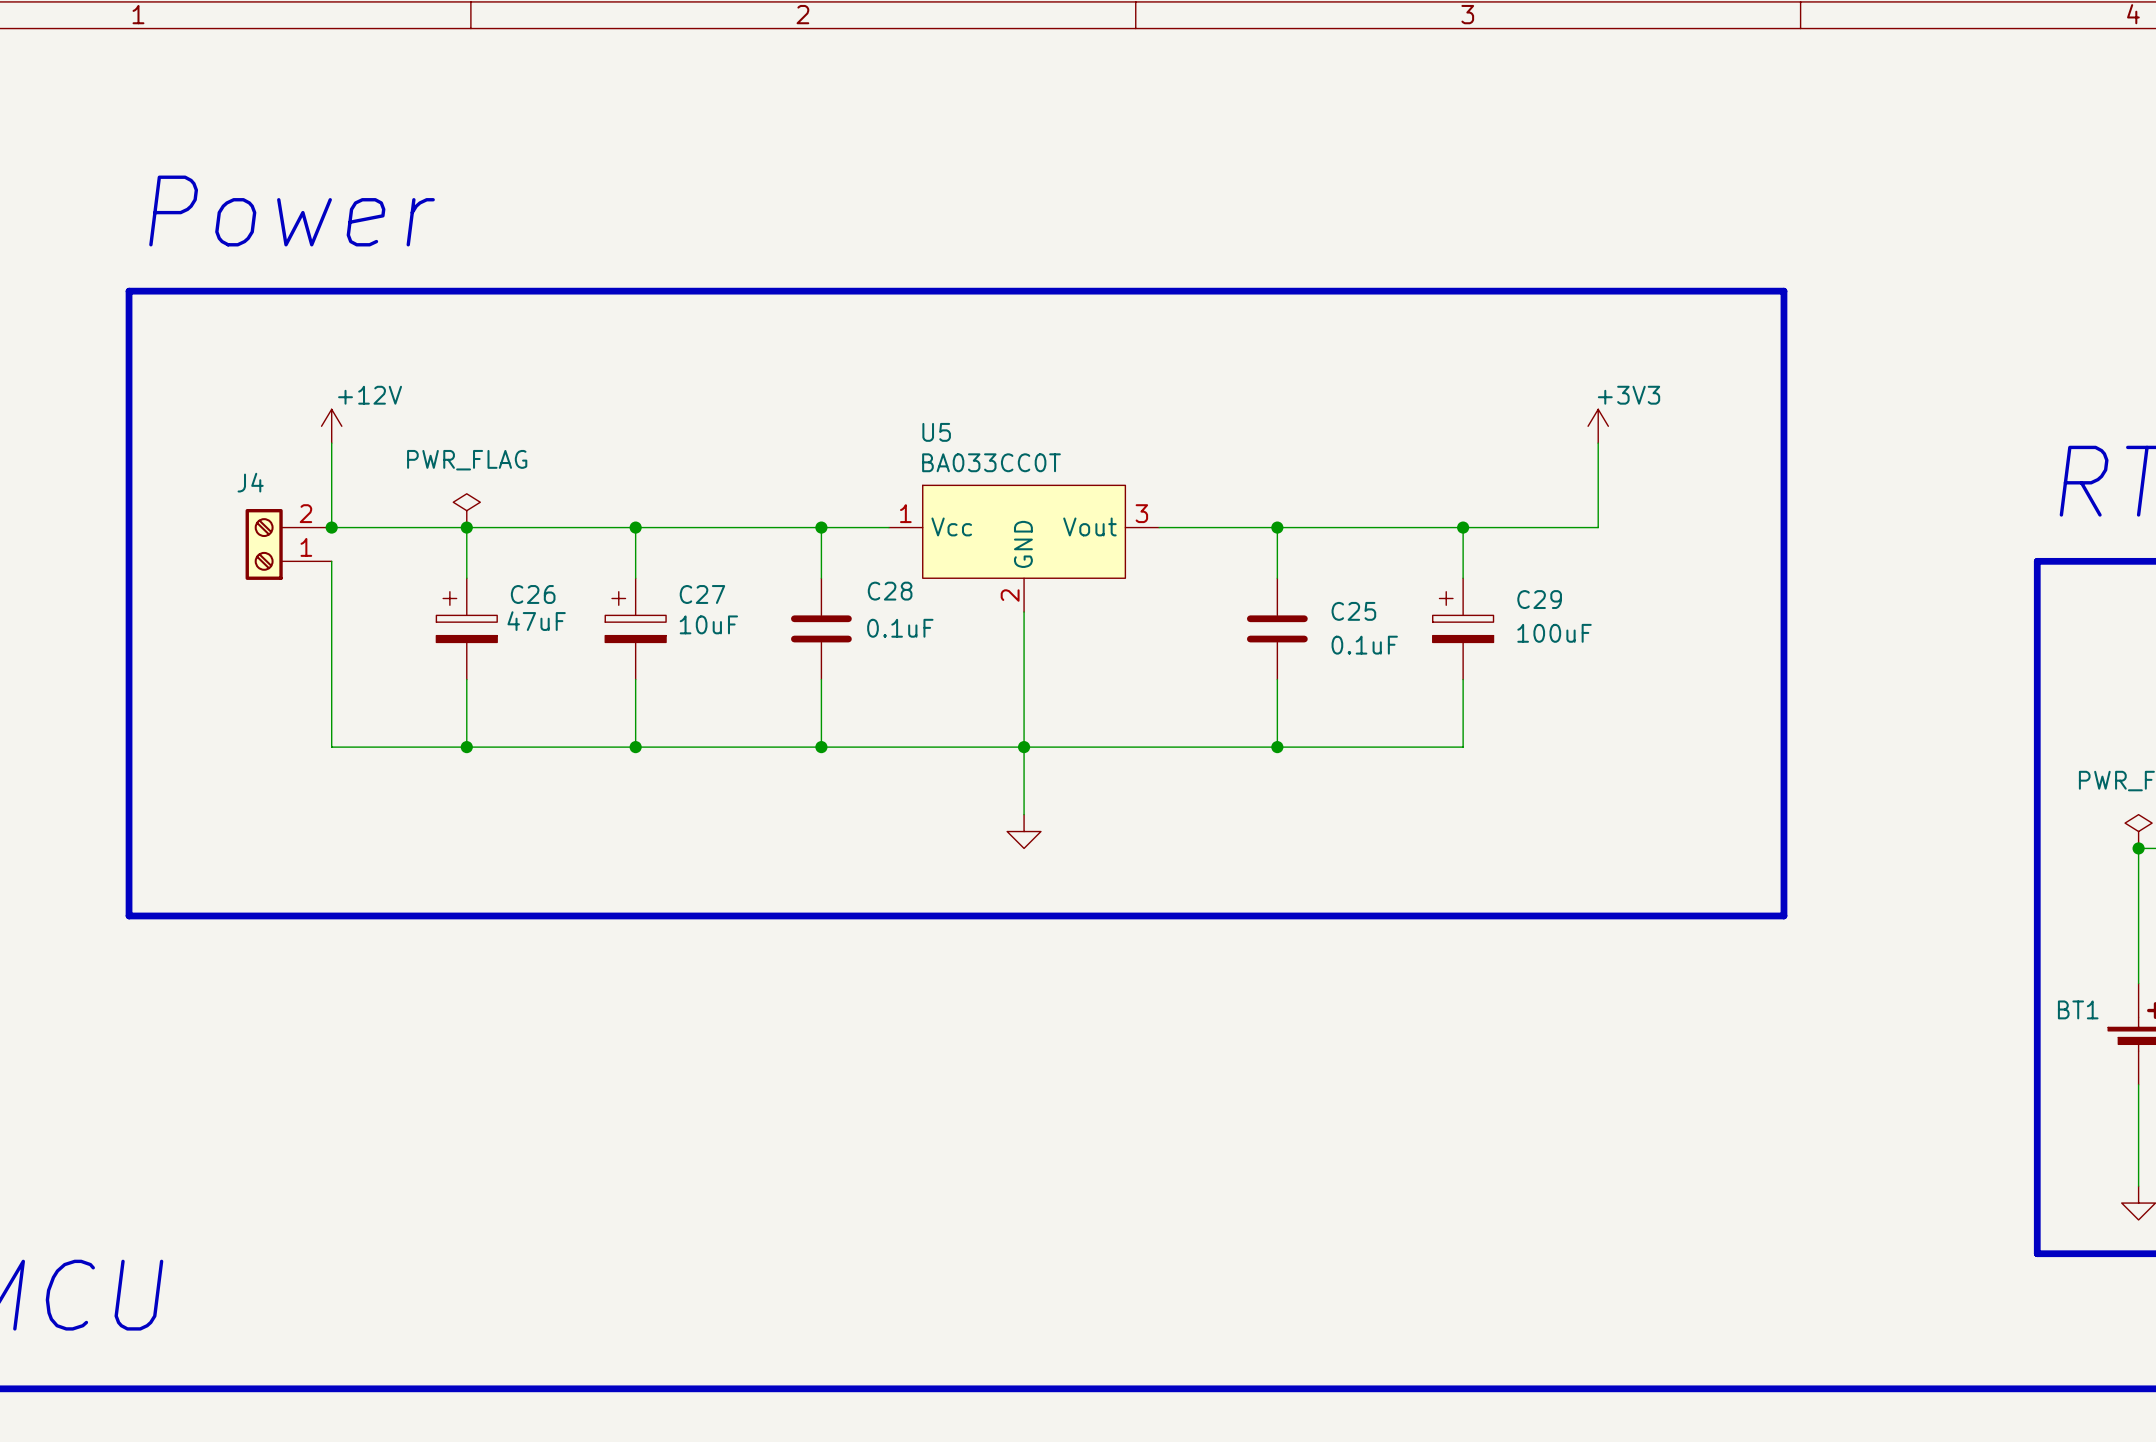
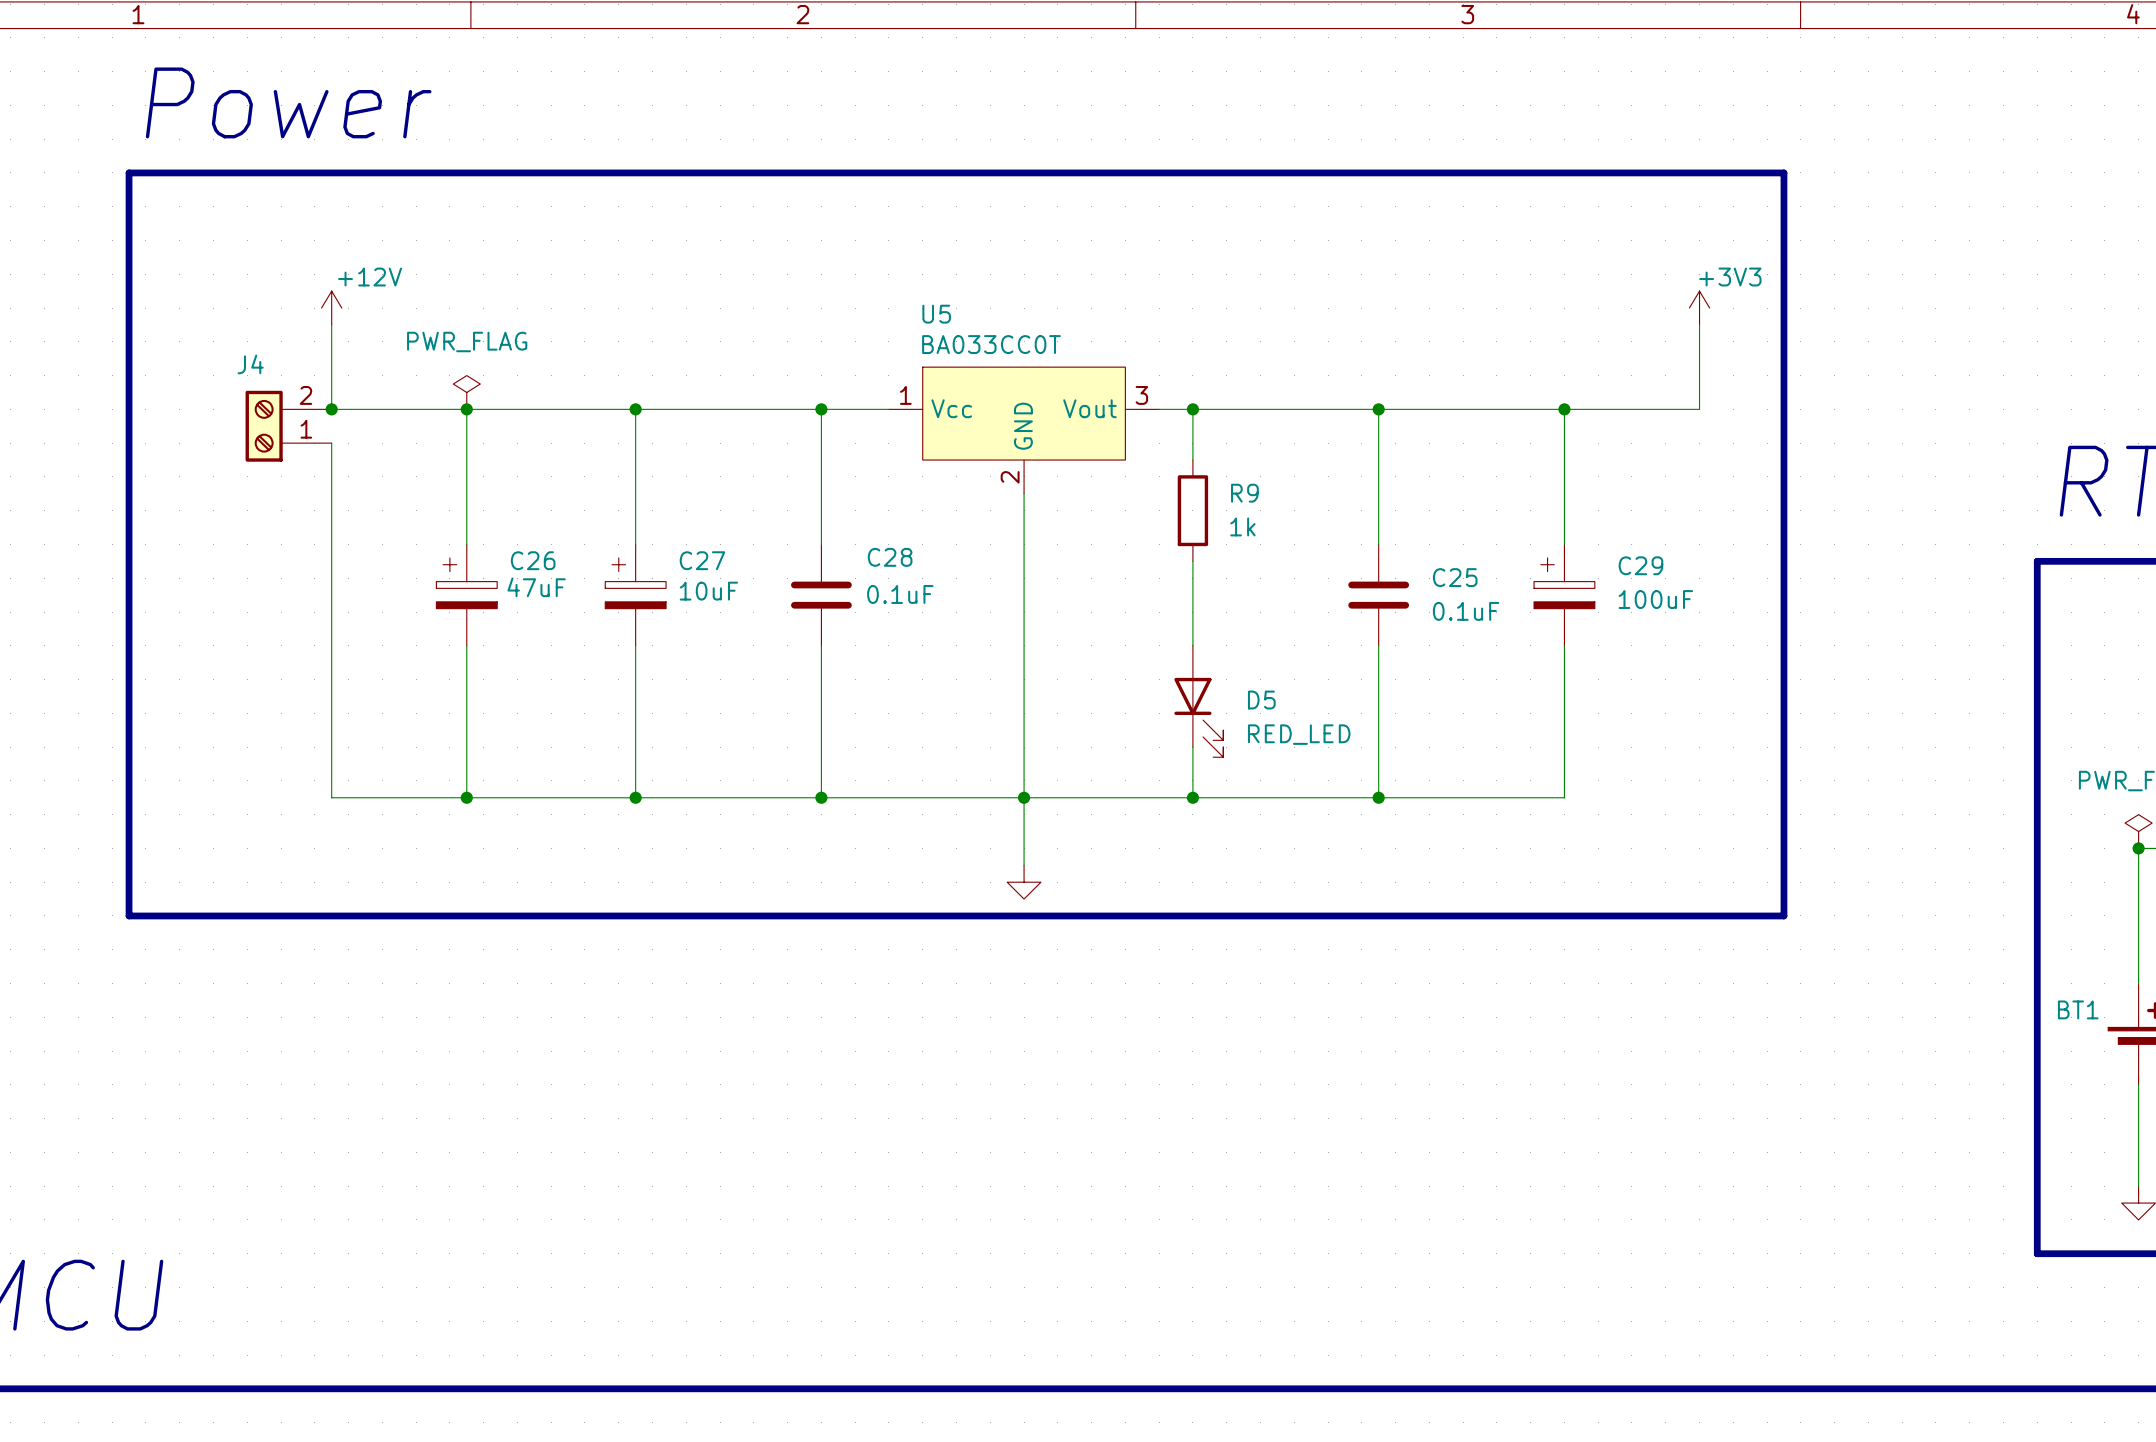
text position: Power (292, 211) -> Power (288, 102)
line: (129, 291) (1783, 291) -> (129, 291) (129, 172) (1783, 172) (1783, 291)
wire: none -> (331, 324) (331, 409) (888, 409)
wire: none -> (1699, 324) (1699, 409) (1159, 409)
junction: none -> (331, 409)
wire: none -> (466, 409) (466, 527)
junction: none -> (466, 409)
wire: none -> (635, 409) (635, 527)
junction: none -> (635, 409)
wire: none -> (821, 409) (821, 527)
junction: none -> (821, 409)
junction: none -> (1192, 409)
wire: none -> (1378, 409) (1378, 544)
junction: none -> (1378, 409)
wire: none -> (1564, 409) (1564, 544)
junction: none -> (1564, 409)
power symbol position: +12V (331, 426) -> +12V (331, 308)
power symbol position: +3V3 (1598, 426) -> +3V3 (1699, 308)
wire: (1598, 443) (1598, 527) (1159, 527) -> none
power symbol position: PWR_FLAG (466, 510) -> PWR_FLAG (466, 392)
R9: none -> 1k (1192, 510)
wire: (331, 527) (888, 527) -> (331, 527) (331, 561)
junction: (331, 527) -> none
junction: (466, 527) -> none
junction: (635, 527) -> none
junction: (821, 527) -> none
wire: (1277, 527) (1277, 578) -> (1192, 409) (1192, 460)
junction: (1277, 527) -> none
wire: (1463, 527) (1463, 578) -> none
junction: (1463, 527) -> none
J4 position: (288, 544) -> (288, 426)
U5 position: (1024, 548) -> (1024, 430)
wire: none -> (1192, 561) (1192, 645)
C26 position: (466, 628) -> (466, 595)
C27 position: (635, 628) -> (635, 595)
C28 position: (821, 628) -> (821, 595)
C25 position: (1277, 628) -> (1378, 595)
C29 position: (1463, 628) -> (1564, 595)
wire: none -> (1378, 645) (1378, 797)
wire: (1277, 679) (1277, 747) -> none
wire: (1463, 679) (1463, 747) (331, 747) -> (1564, 645) (1564, 797) (331, 797) (331, 747)
D5: none -> RED_LED (1198, 701)
wire: none -> (466, 747) (466, 797)
junction position: (466, 747) -> (466, 797)
wire: none -> (635, 747) (635, 797)
junction position: (635, 747) -> (635, 797)
wire: none -> (821, 747) (821, 797)
junction position: (821, 747) -> (821, 797)
junction position: (1024, 747) -> (1024, 797)
wire: none -> (1192, 747) (1192, 797)
junction: (1277, 747) -> none
junction: none -> (1192, 797)
junction: none -> (1378, 797)
wire: none -> (1024, 814) (1024, 865)
power symbol position: (1024, 831) -> (1024, 882)

